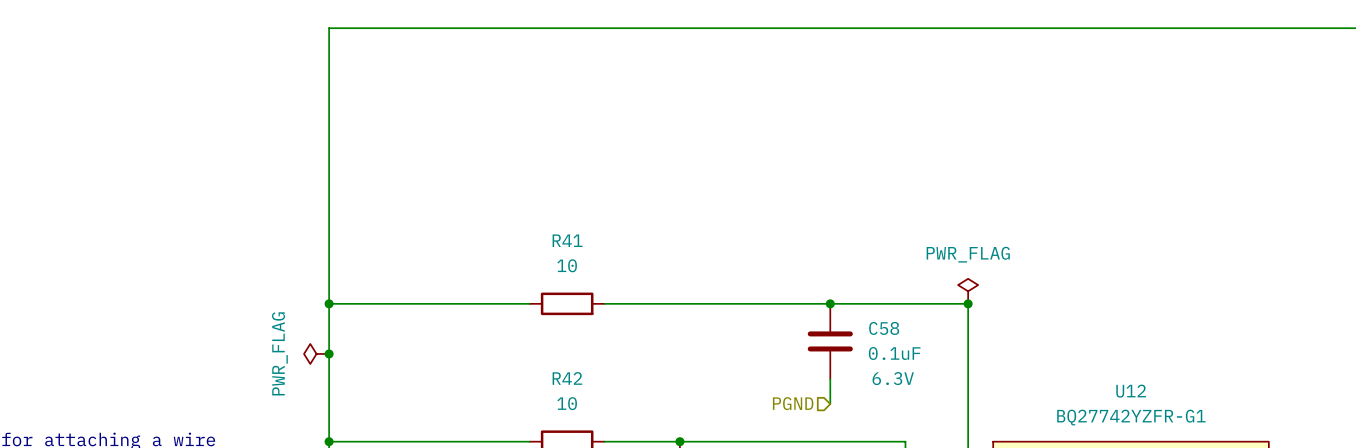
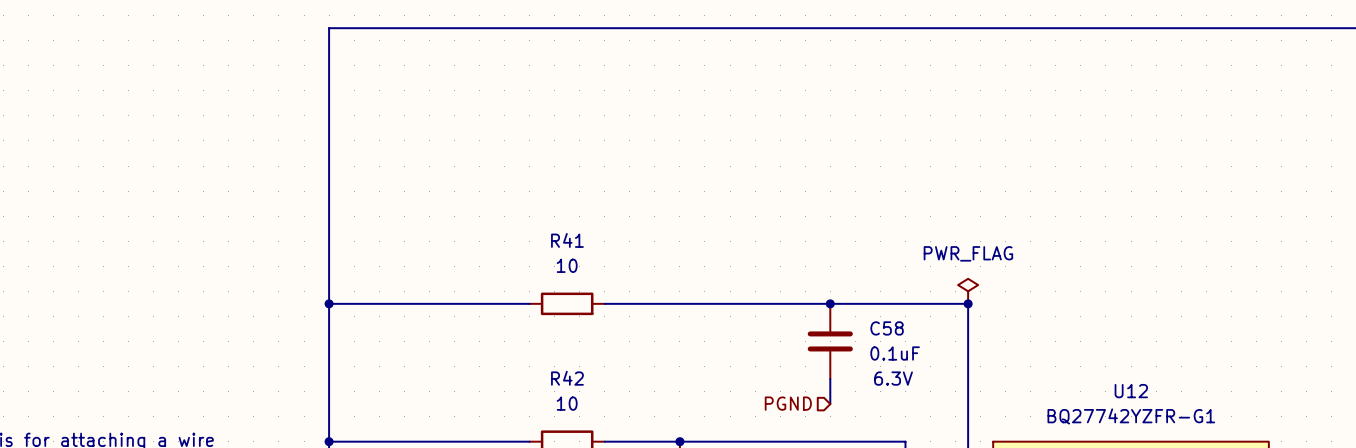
power symbol: PWR_FLAG (316, 353) -> none
junction: (329, 353) -> none

